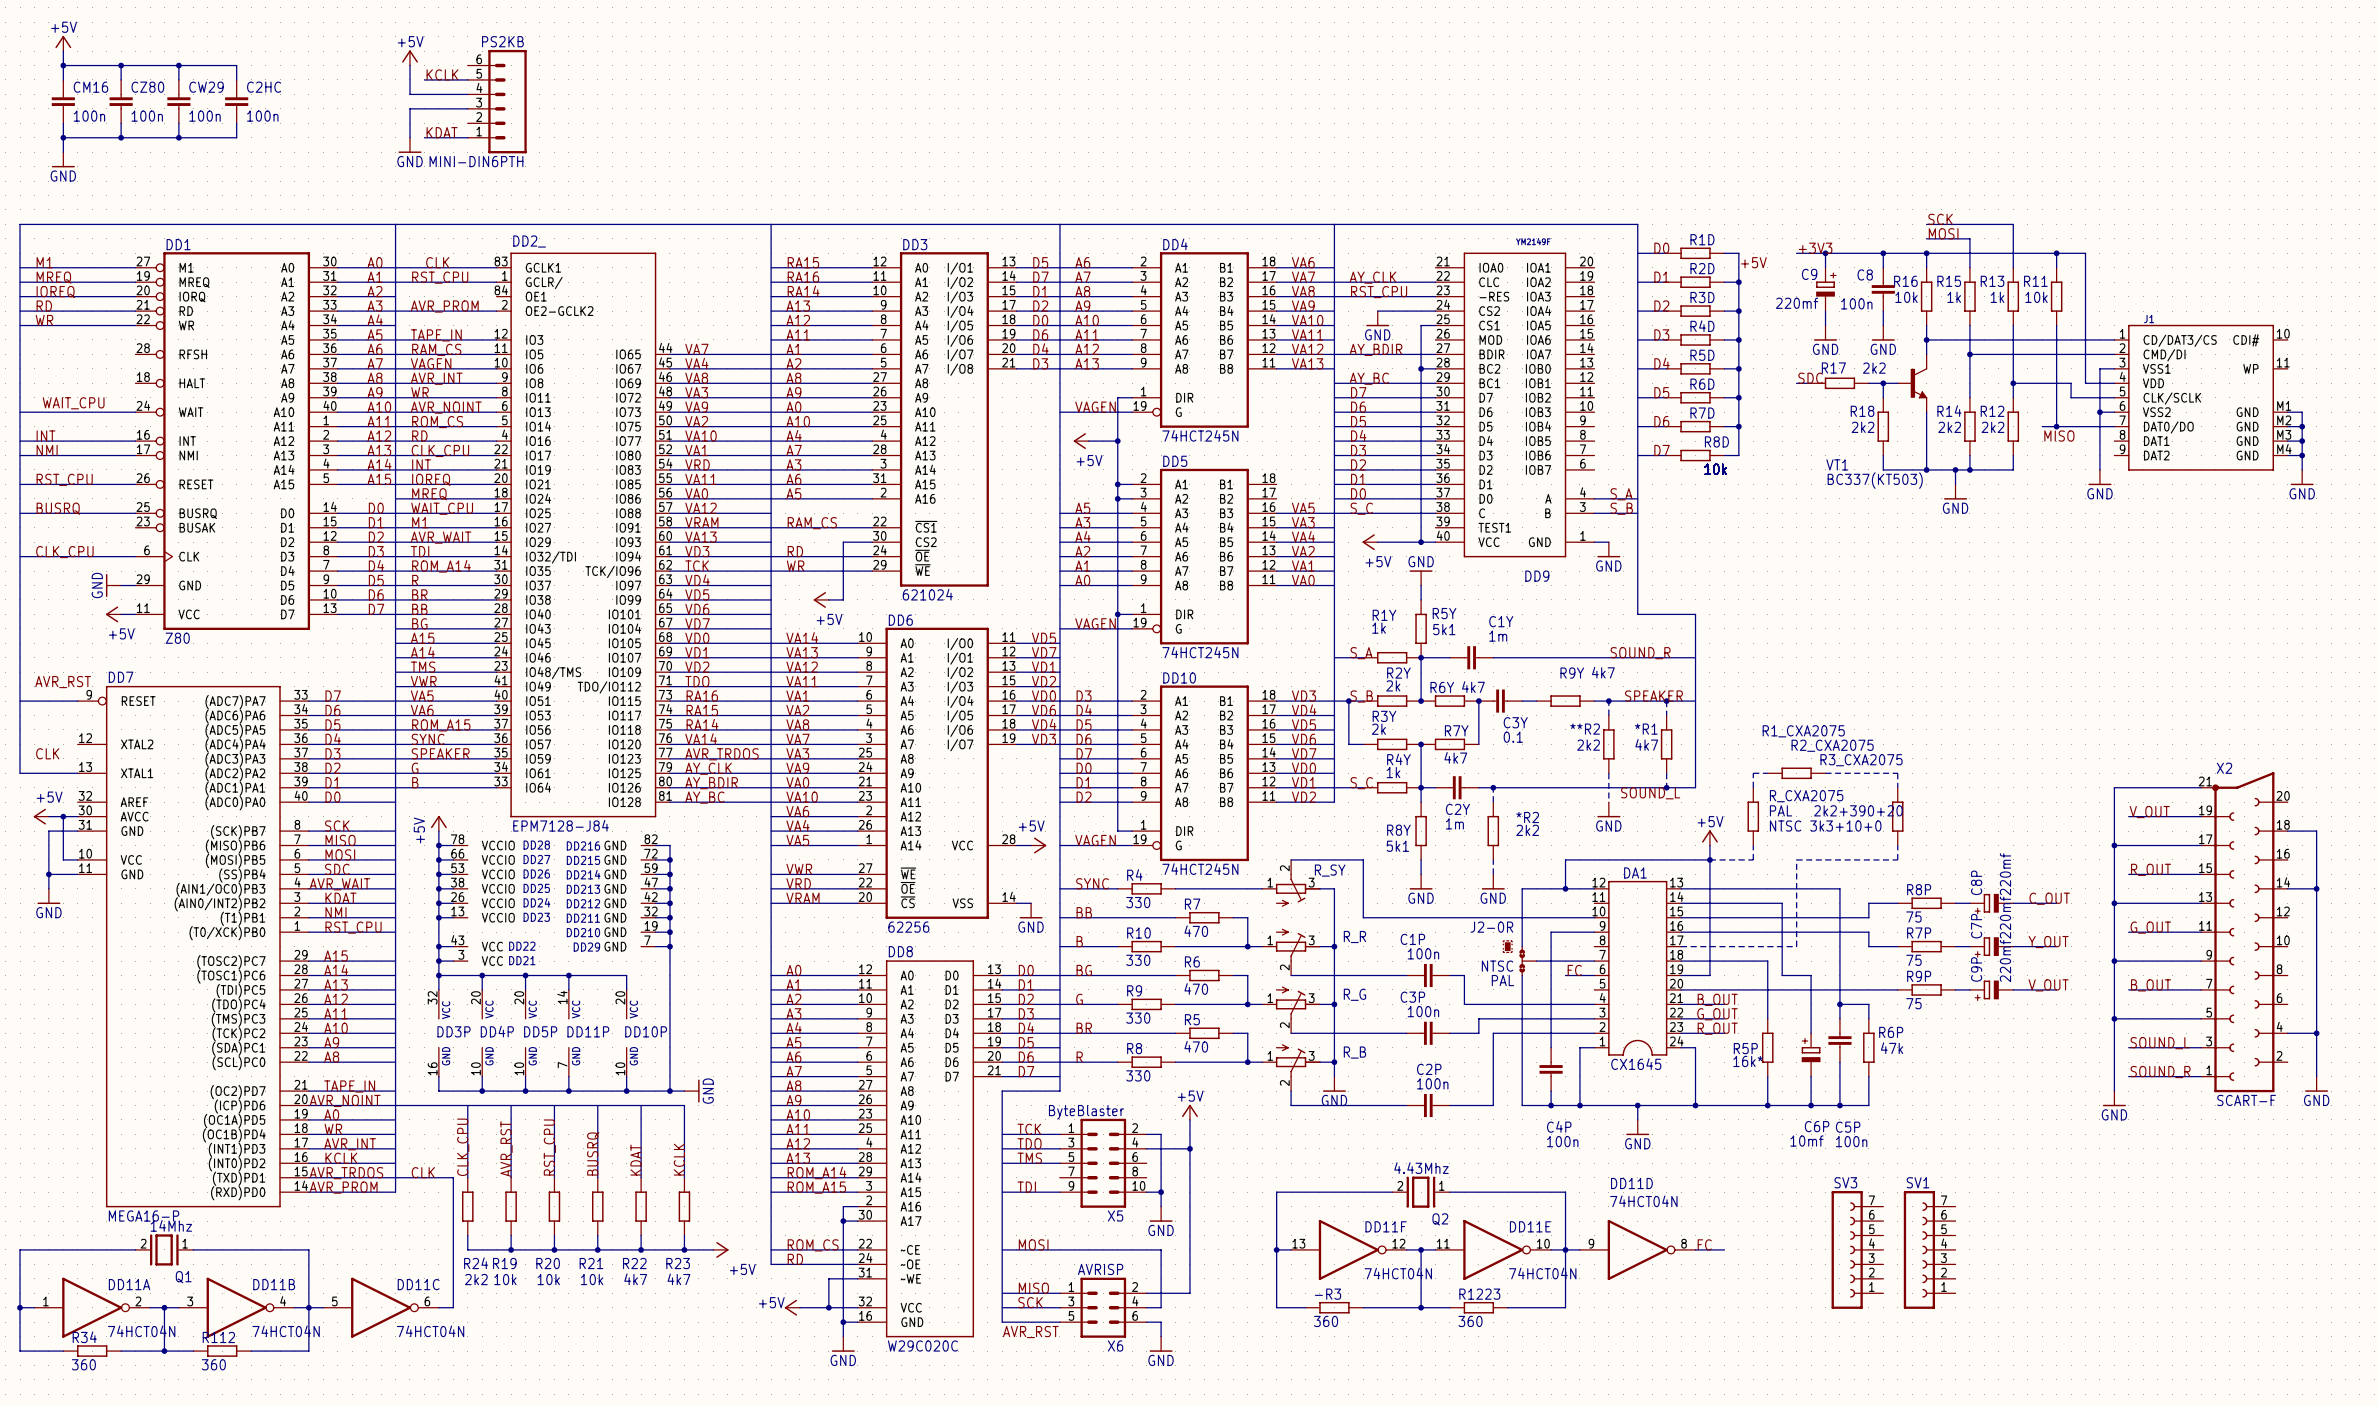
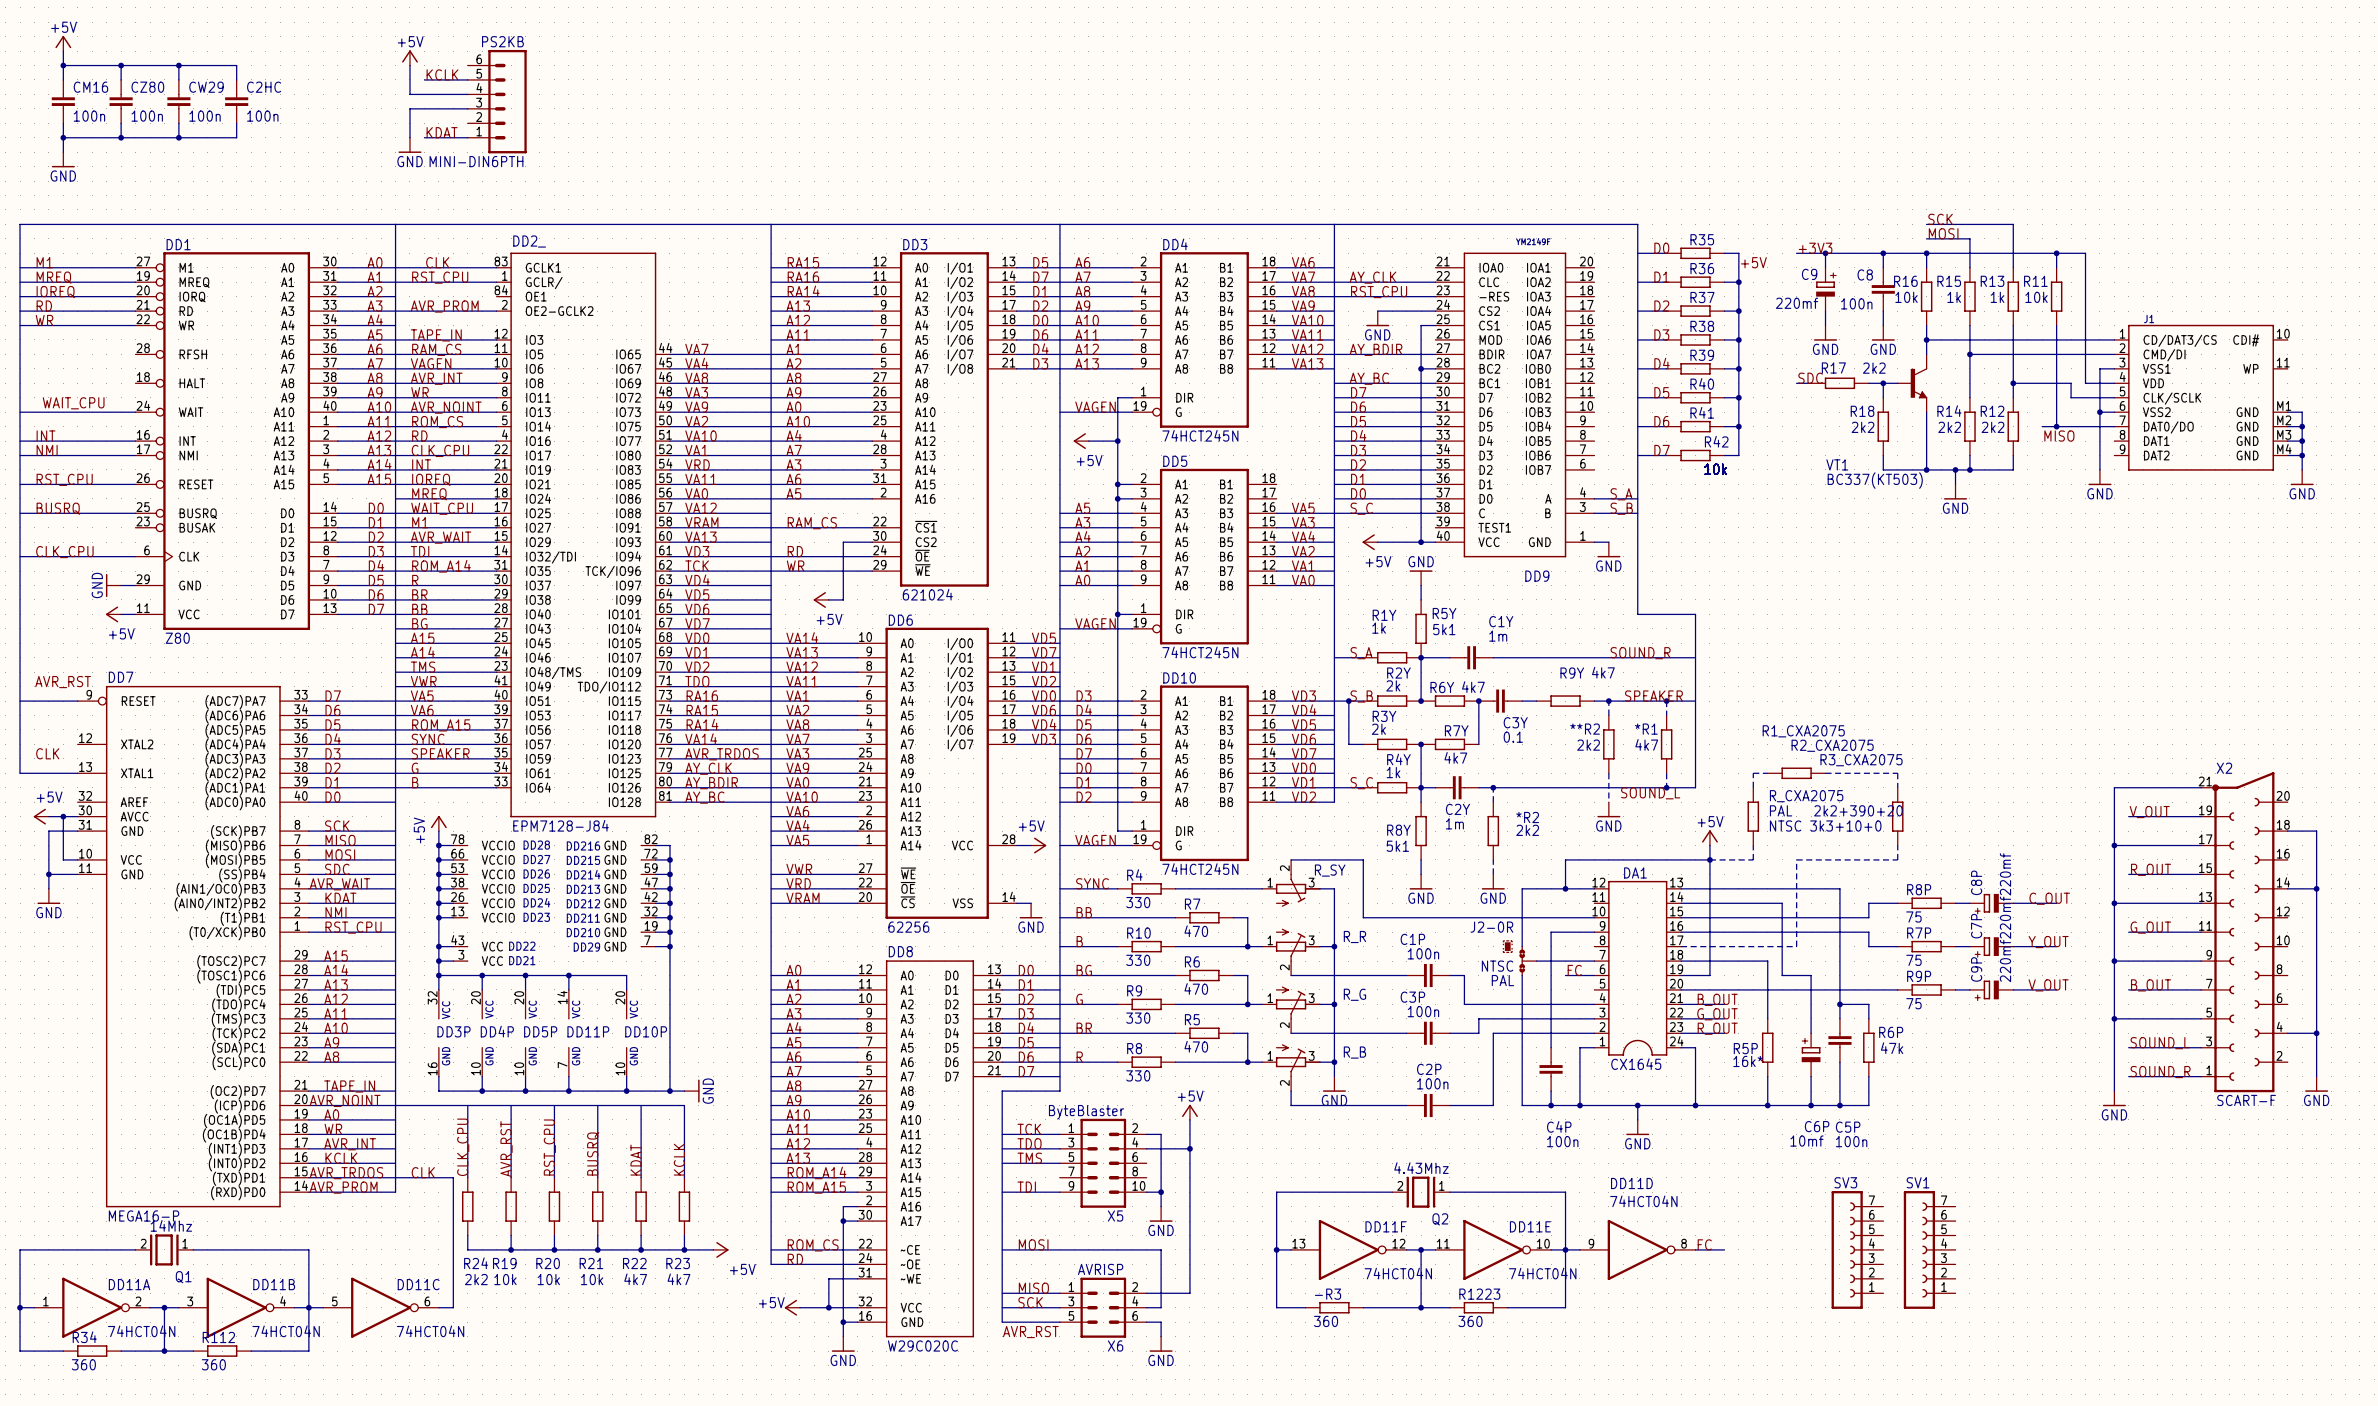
R1D name: R1D (1702, 239) -> R35 (1702, 239)
R2D name: R2D (1702, 268) -> R36 (1702, 268)
R3D name: R3D (1702, 297) -> R37 (1702, 297)
R4D name: R4D (1702, 326) -> R38 (1702, 326)
R5D name: R5D (1702, 355) -> R39 (1702, 355)
R6D name: R6D (1702, 384) -> R40 (1702, 383)
R7D name: R7D (1702, 413) -> R41 (1702, 412)
R8D name: R8D (1716, 441) -> R42 (1716, 441)

